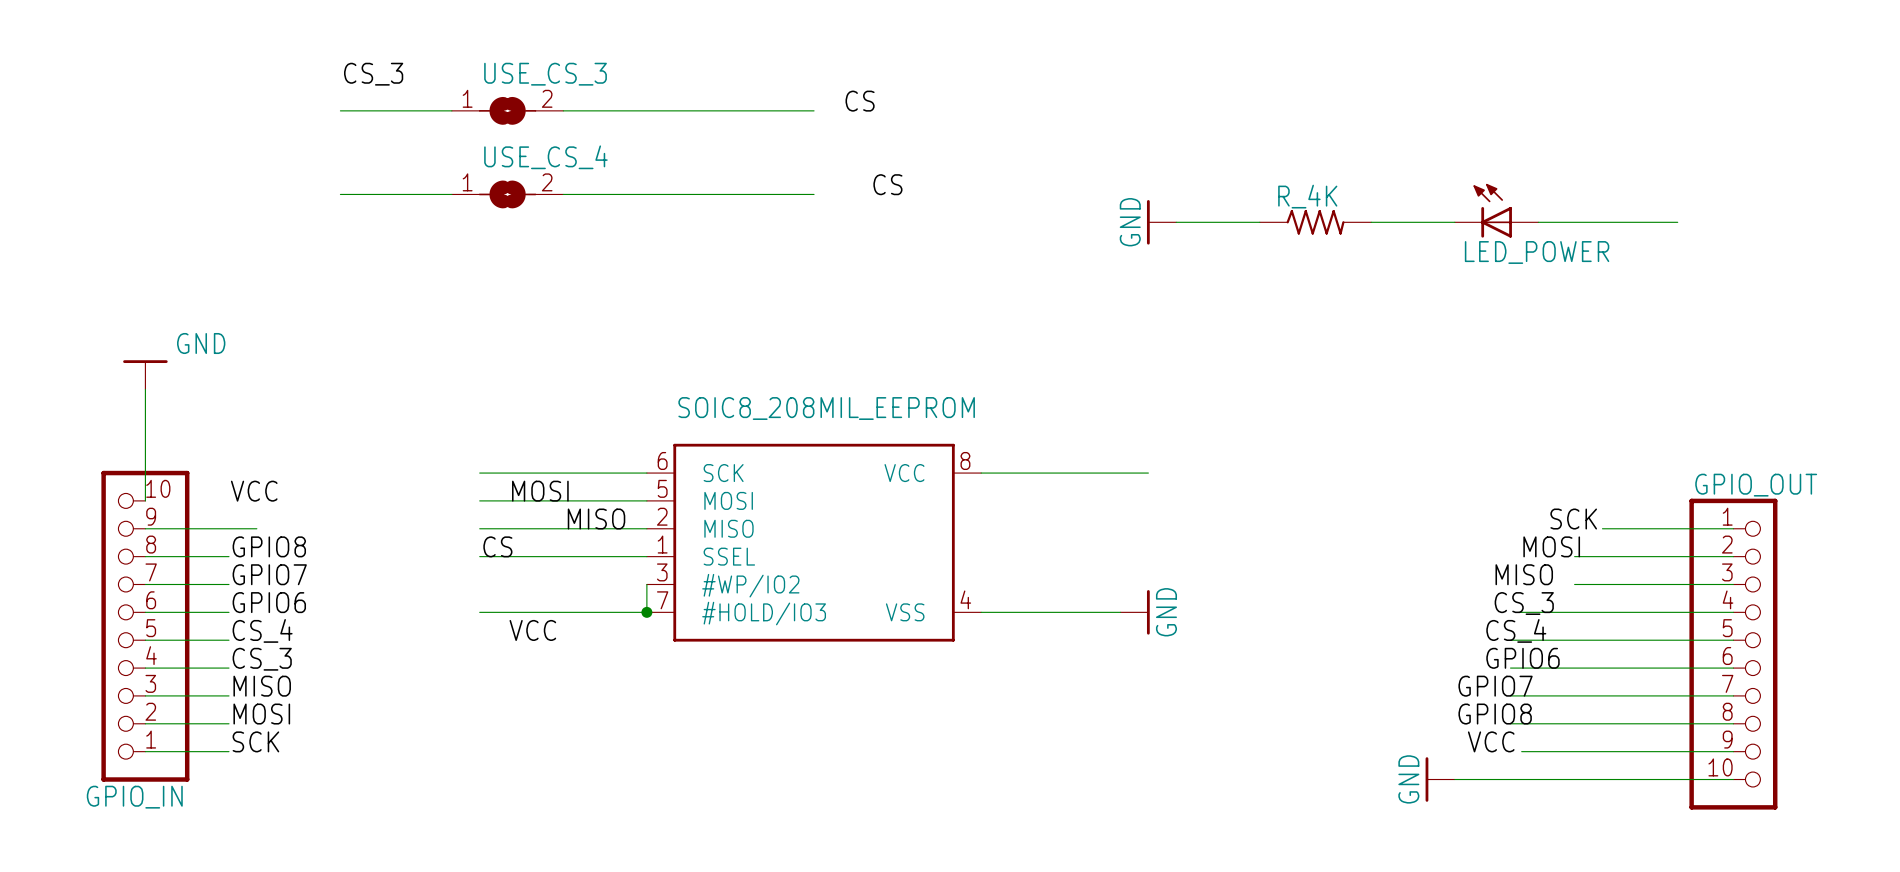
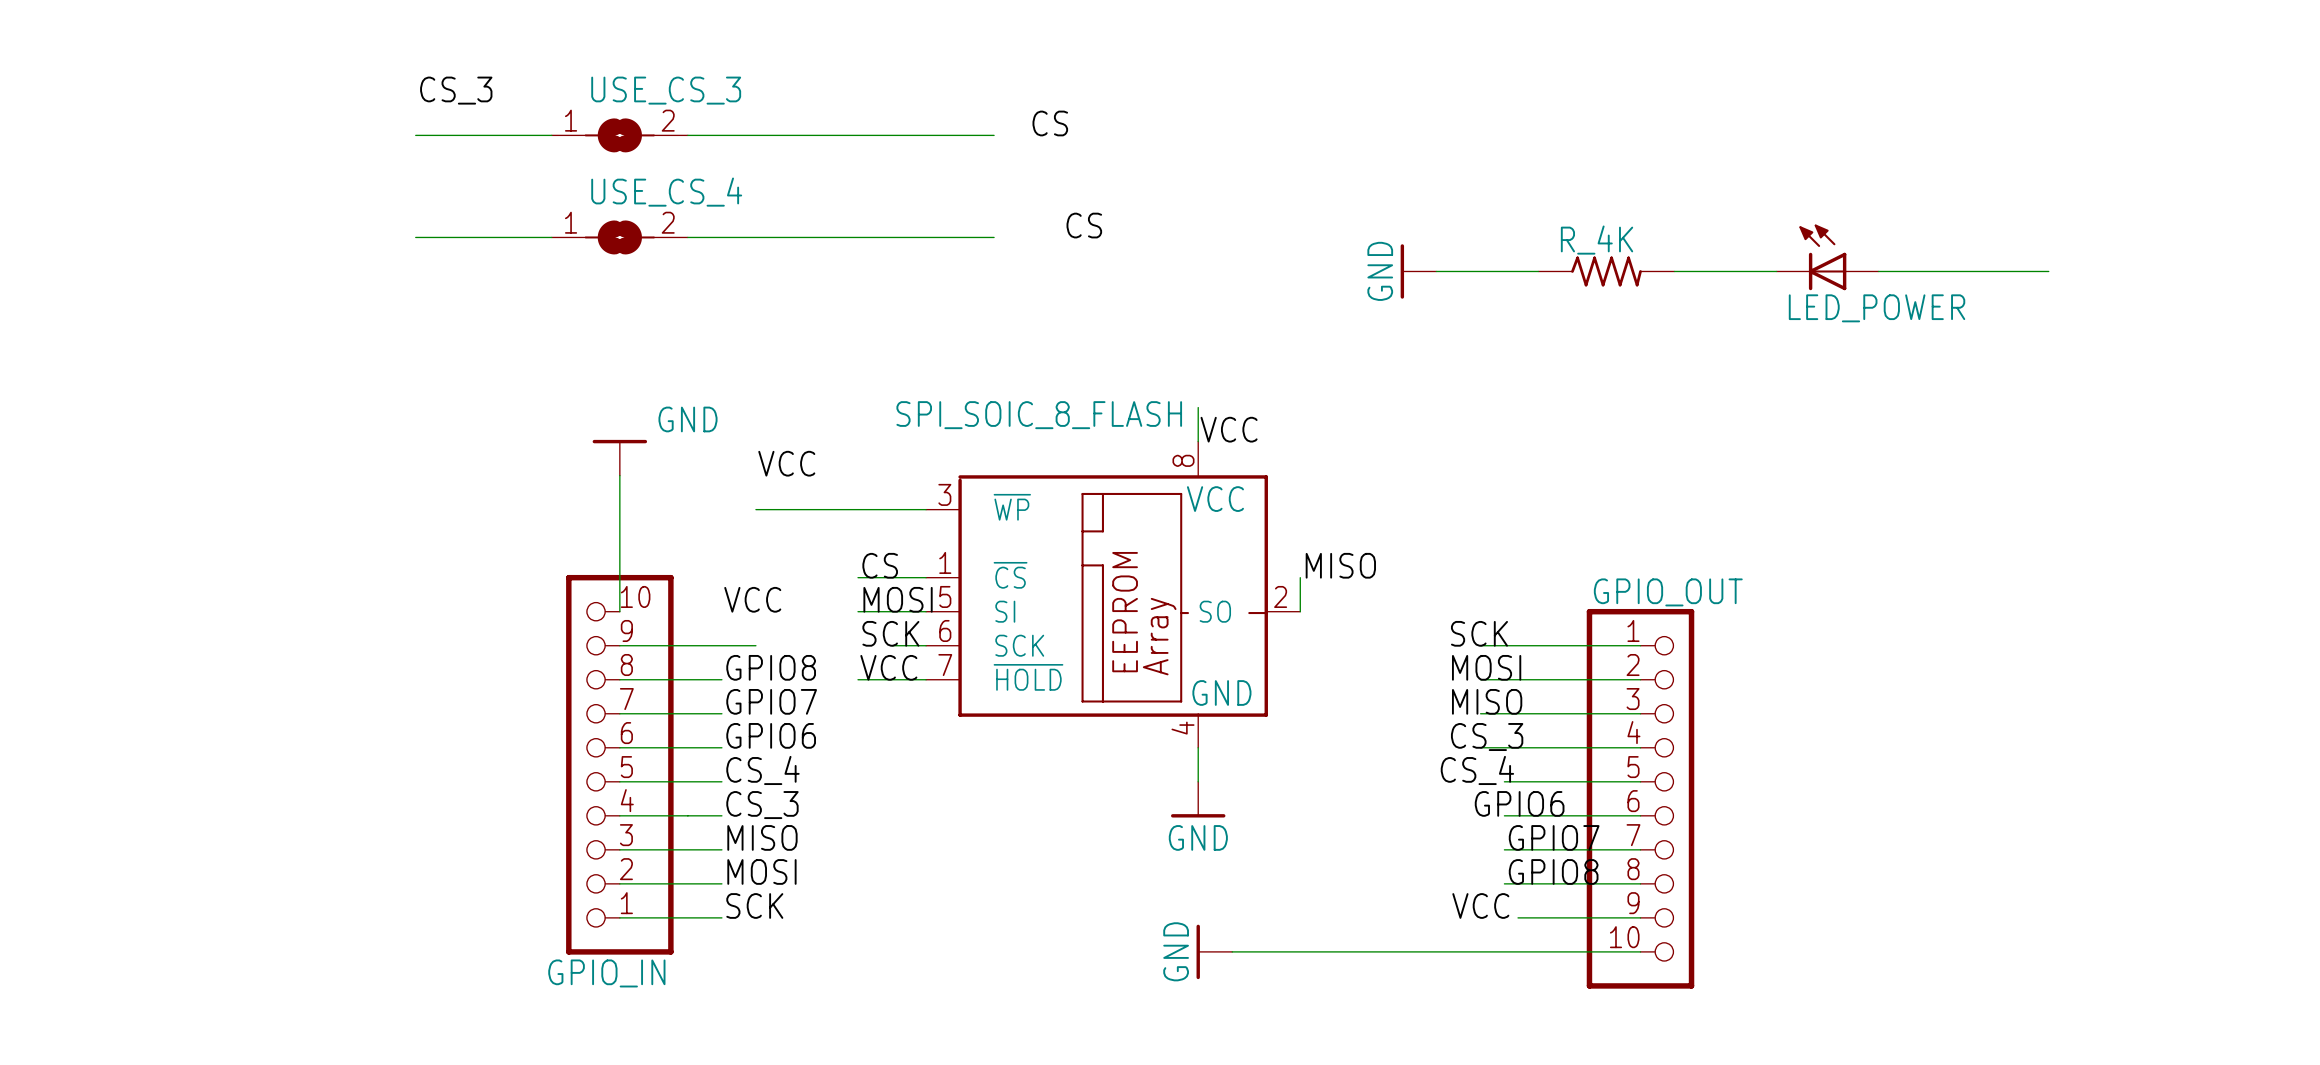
wire: none -> (1198, 407) (1198, 441)
label: none -> VCC (1229, 429)
power symbol: GND (145, 374) -> none
power symbol: none -> GND (619, 457)
label: none -> VCC (786, 463)
wire: (145, 389) (145, 500) -> none
wire: none -> (619, 475) (619, 611)
wire: none -> (755, 509) (926, 509)
label: none -> MISO (1340, 565)
wire: (479, 473) (646, 473) -> none
wire: none -> (858, 577) (926, 577)
wire: (981, 473) (1148, 473) -> none
wire: none -> (1300, 577) (1300, 611)
SPI_SOIC_8_FLASH: none -> (1113, 594)
label: VCC (254, 491) -> none
label: MOSI (540, 491) -> none
label: none -> VCC (752, 599)
label: none -> MOSI (898, 599)
wire: (479, 500) (646, 500) -> none
wire: none -> (858, 611) (926, 611)
label position: MISO (596, 519) -> MISO (762, 837)
label: none -> SCK (890, 633)
label: none -> SCK (1479, 633)
label: SCK (1573, 519) -> none
wire: (145, 528) (256, 528) -> none
wire: (479, 528) (507, 528) -> none
wire: (619, 528) (646, 528) -> (892, 645) (926, 645)
wire: none -> (1480, 645) (1640, 645)
wire: (1602, 528) (1733, 528) -> none
SOIC8_208MIL_EEPROM: (814, 542) -> none
label: GPIO8 (269, 546) -> none
label position: CS (497, 546) -> CS (880, 565)
label: none -> GPIO8 (771, 667)
label: none -> VCC (888, 667)
label: none -> MOSI (1486, 667)
label: MOSI (1551, 546) -> none
wire: (145, 556) (228, 556) -> none
wire: (479, 556) (507, 556) -> none
wire: (591, 556) (646, 556) -> (858, 679) (926, 679)
wire: none -> (1480, 679) (1640, 679)
wire: (1574, 556) (1733, 556) -> none
label: GPIO7 (269, 574) -> none
label: none -> GPIO7 (771, 701)
label: none -> MISO (1487, 701)
label: MISO (1524, 574) -> none
wire: (145, 584) (228, 584) -> none
wire: none -> (619, 713) (721, 713)
wire: (646, 584) (646, 612) (591, 612) -> none
wire: none -> (1480, 713) (1640, 713)
wire: (1574, 584) (1733, 584) -> none
label: GPIO6 (269, 602) -> none
label: none -> GPIO6 (771, 735)
label: none -> CS_3 (1487, 737)
label: CS_3 (1524, 603) -> none
wire: (145, 612) (228, 612) -> none
wire: (479, 612) (507, 612) -> none
junction: (646, 612) -> none
wire: (981, 612) (1120, 612) -> (1198, 747) (1198, 781)
power symbol: GND (1135, 612) -> none
wire: none -> (1480, 747) (1640, 747)
wire: (1518, 612) (1733, 612) -> none
GPIO_IN: (145, 626) -> none
GPIO_IN: none -> (619, 764)
label: CS_4 (262, 630) -> none
label: VCC (532, 630) -> none
label: none -> CS_4 (762, 770)
label: none -> CS_4 (1477, 770)
label: CS_4 (1516, 630) -> none
wire: (145, 640) (228, 640) -> none
wire: none -> (619, 781) (721, 781)
wire: none -> (1504, 781) (1640, 781)
wire: (1510, 640) (1733, 640) -> none
power symbol: none -> GND (1198, 799)
GPIO_OUT: none -> (1640, 798)
GPIO_OUT: (1733, 654) -> none
label: none -> GPIO6 (1519, 803)
label: GPIO6 (1522, 658) -> none
label: CS_3 (262, 659) -> none
label: none -> CS_3 (762, 805)
wire: (145, 668) (228, 668) -> none
wire: none -> (619, 815) (721, 815)
wire: none -> (1504, 815) (1640, 815)
wire: (1510, 668) (1733, 668) -> none
label: MISO (262, 686) -> none
label position: GPIO7 (1495, 686) -> GPIO7 (1554, 837)
wire: (145, 695) (228, 695) -> none
wire: none -> (619, 849) (721, 849)
wire: none -> (1504, 849) (1640, 849)
wire: (1510, 695) (1733, 695) -> none
label: MOSI (261, 714) -> none
label: none -> MOSI (761, 871)
label position: GPIO8 (1495, 714) -> GPIO8 (1553, 871)
wire: (145, 723) (228, 723) -> none
wire: none -> (619, 883) (721, 883)
wire: none -> (1504, 883) (1640, 883)
wire: (1510, 723) (1733, 723) -> none
label: SCK (255, 741) -> none
label: none -> SCK (754, 905)
label: none -> VCC (1480, 905)
label: VCC (1491, 741) -> none
wire: (145, 751) (228, 751) -> none
wire: none -> (619, 917) (721, 917)
wire: none -> (1518, 917) (1640, 917)
wire: (1521, 751) (1733, 751) -> none
power symbol: none -> GND (1214, 951)
wire: none -> (1232, 951) (1640, 951)
power symbol: GND (1440, 779) -> none
wire: (1454, 779) (1733, 779) -> none

